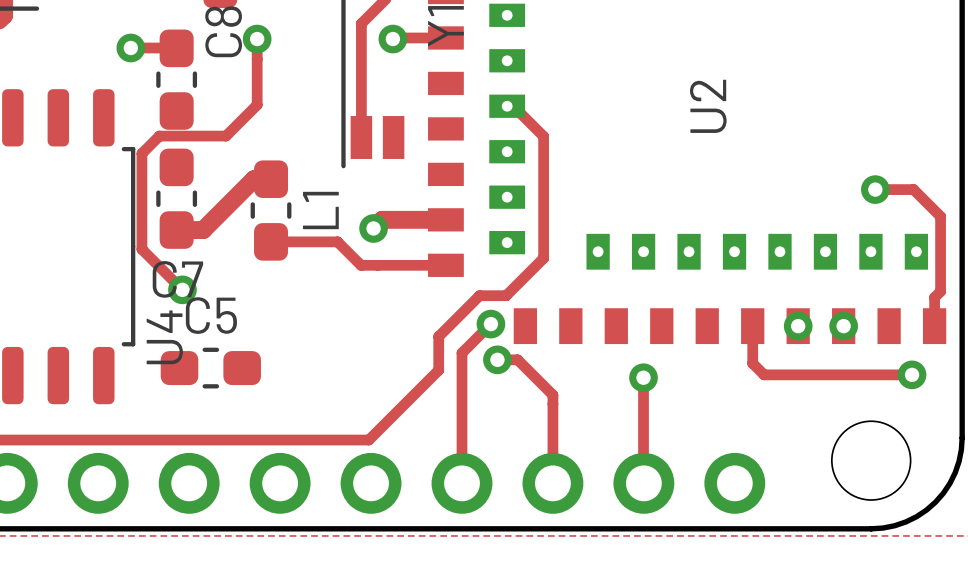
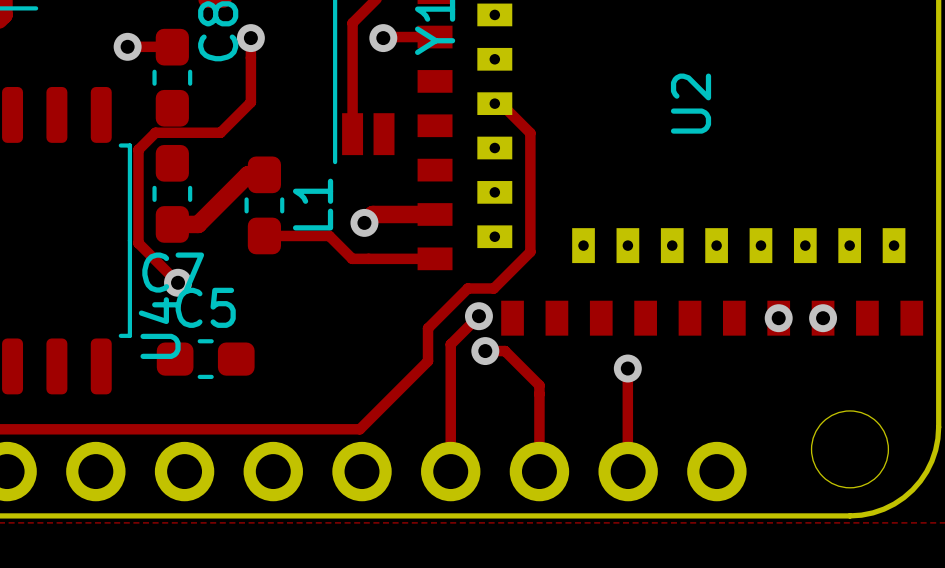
track: (875, 189) (913, 189) (940, 216) (940, 291) (934, 297) (934, 326) -> none
via: (875, 189) -> none
track: (752, 326) (752, 363) (764, 374) (912, 374) -> none
via: (912, 374) -> none

